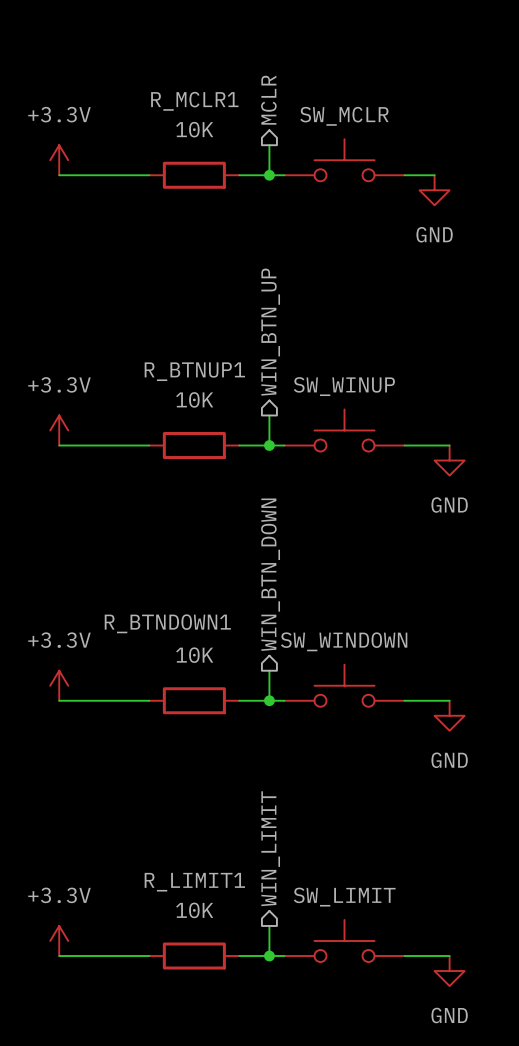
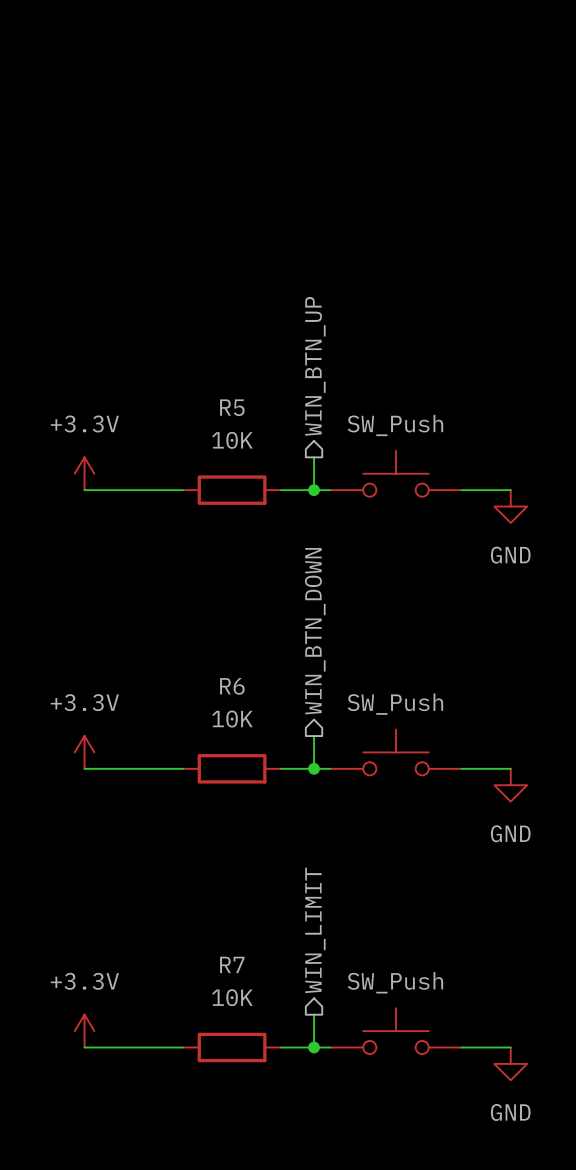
hierarchical label: MCLR (268, 100) -> none
wire: (269, 145) (269, 175) -> none
power symbol: +3.3V (59, 160) -> none
part: SW_MCLR (344, 160) -> none
wire: (59, 175) (149, 175) -> none
R_MCLR1: 10K (194, 175) -> none
wire: (239, 175) (284, 175) -> none
junction: (269, 175) -> none
wire: (404, 175) (434, 175) -> none
power symbol: GND (434, 190) -> none
R_BTNUP1 name: R_BTNUP1 (194, 371) -> R5 (232, 407)
part value: SW_WINUP (344, 386) -> SW_Push (395, 425)
R_BTNDOWN1 name: R_BTNDOWN1 (167, 623) -> R6 (232, 686)
part value: SW_WINDOWN (344, 641) -> SW_Push (395, 704)
R_LIMIT1 name: R_LIMIT1 (194, 882) -> R7 (232, 964)
part value: SW_LIMIT (344, 897) -> SW_Push (395, 982)

